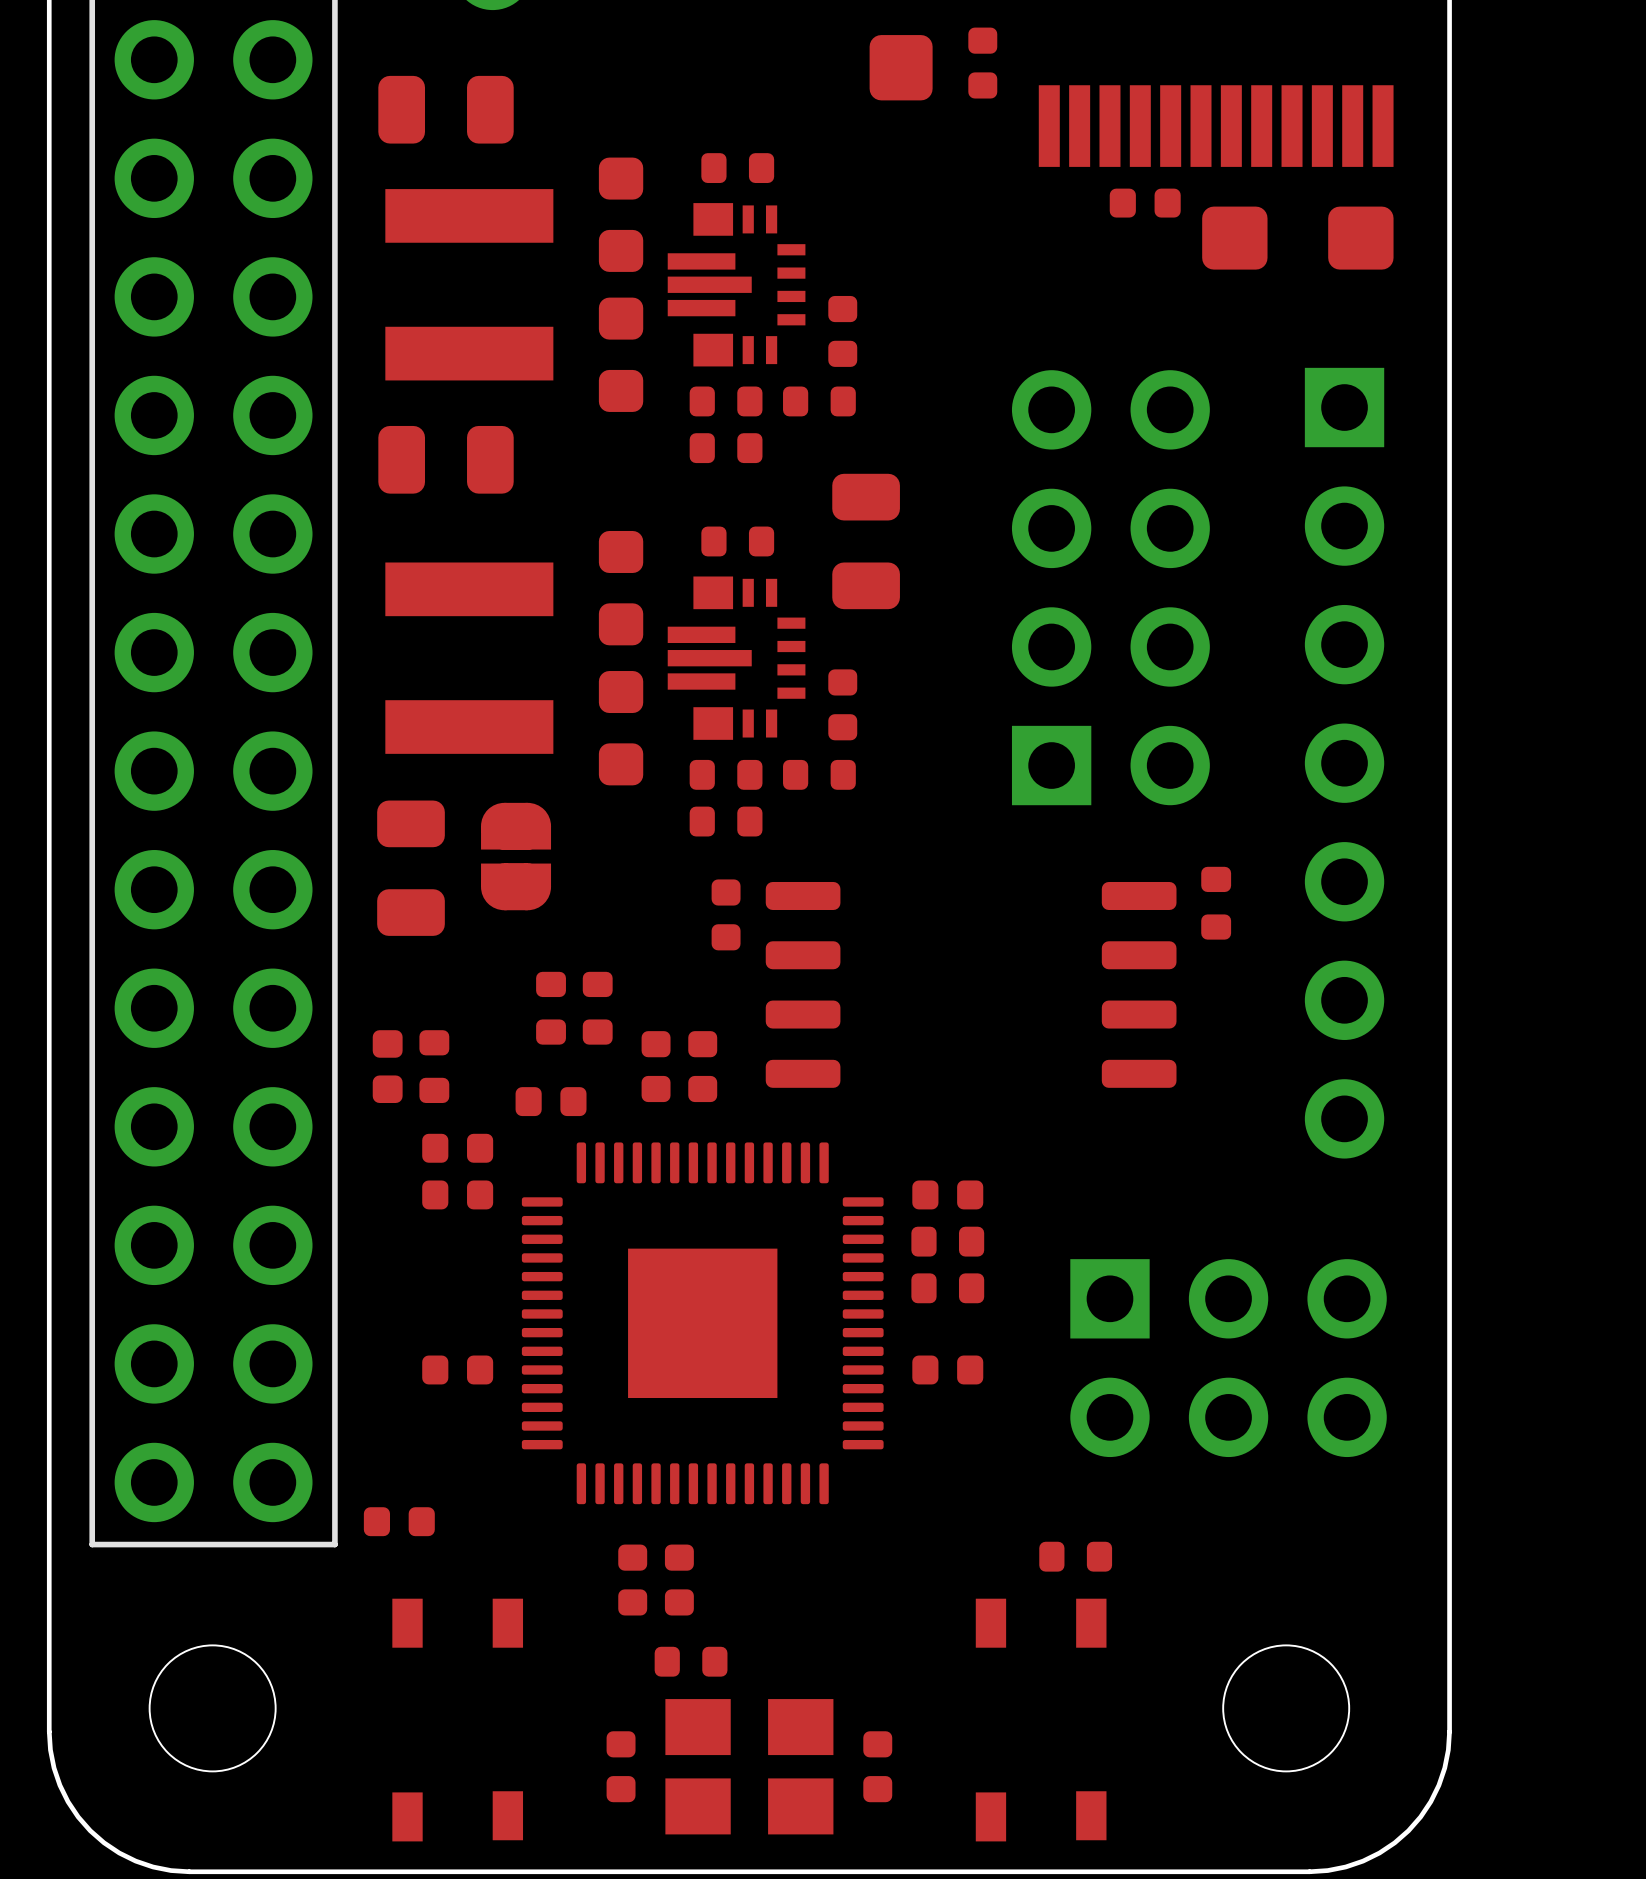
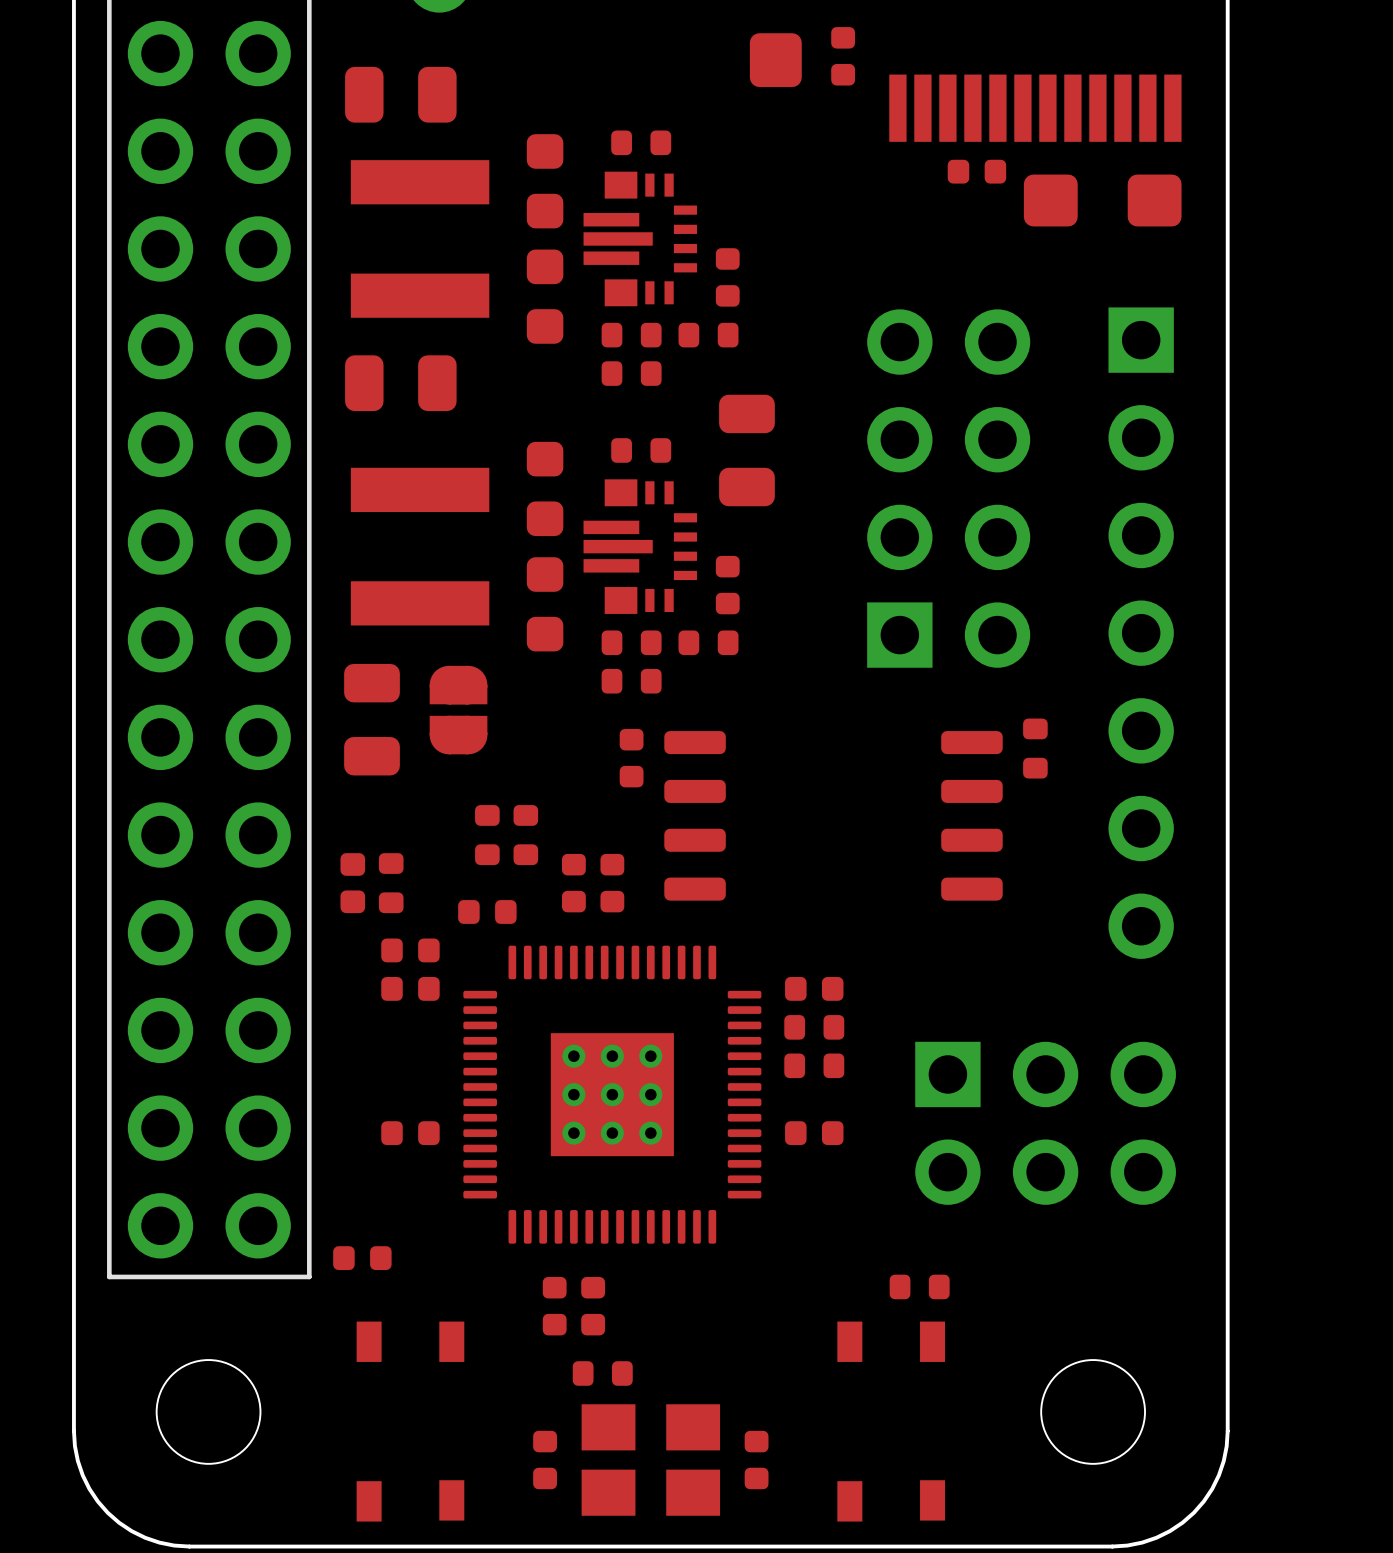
via: none -> (573, 1056)
via: none -> (612, 1056)
via: none -> (650, 1056)
via: none -> (573, 1094)
via: none -> (612, 1094)
via: none -> (650, 1094)
via: none -> (573, 1133)
via: none -> (612, 1133)
via: none -> (650, 1133)

